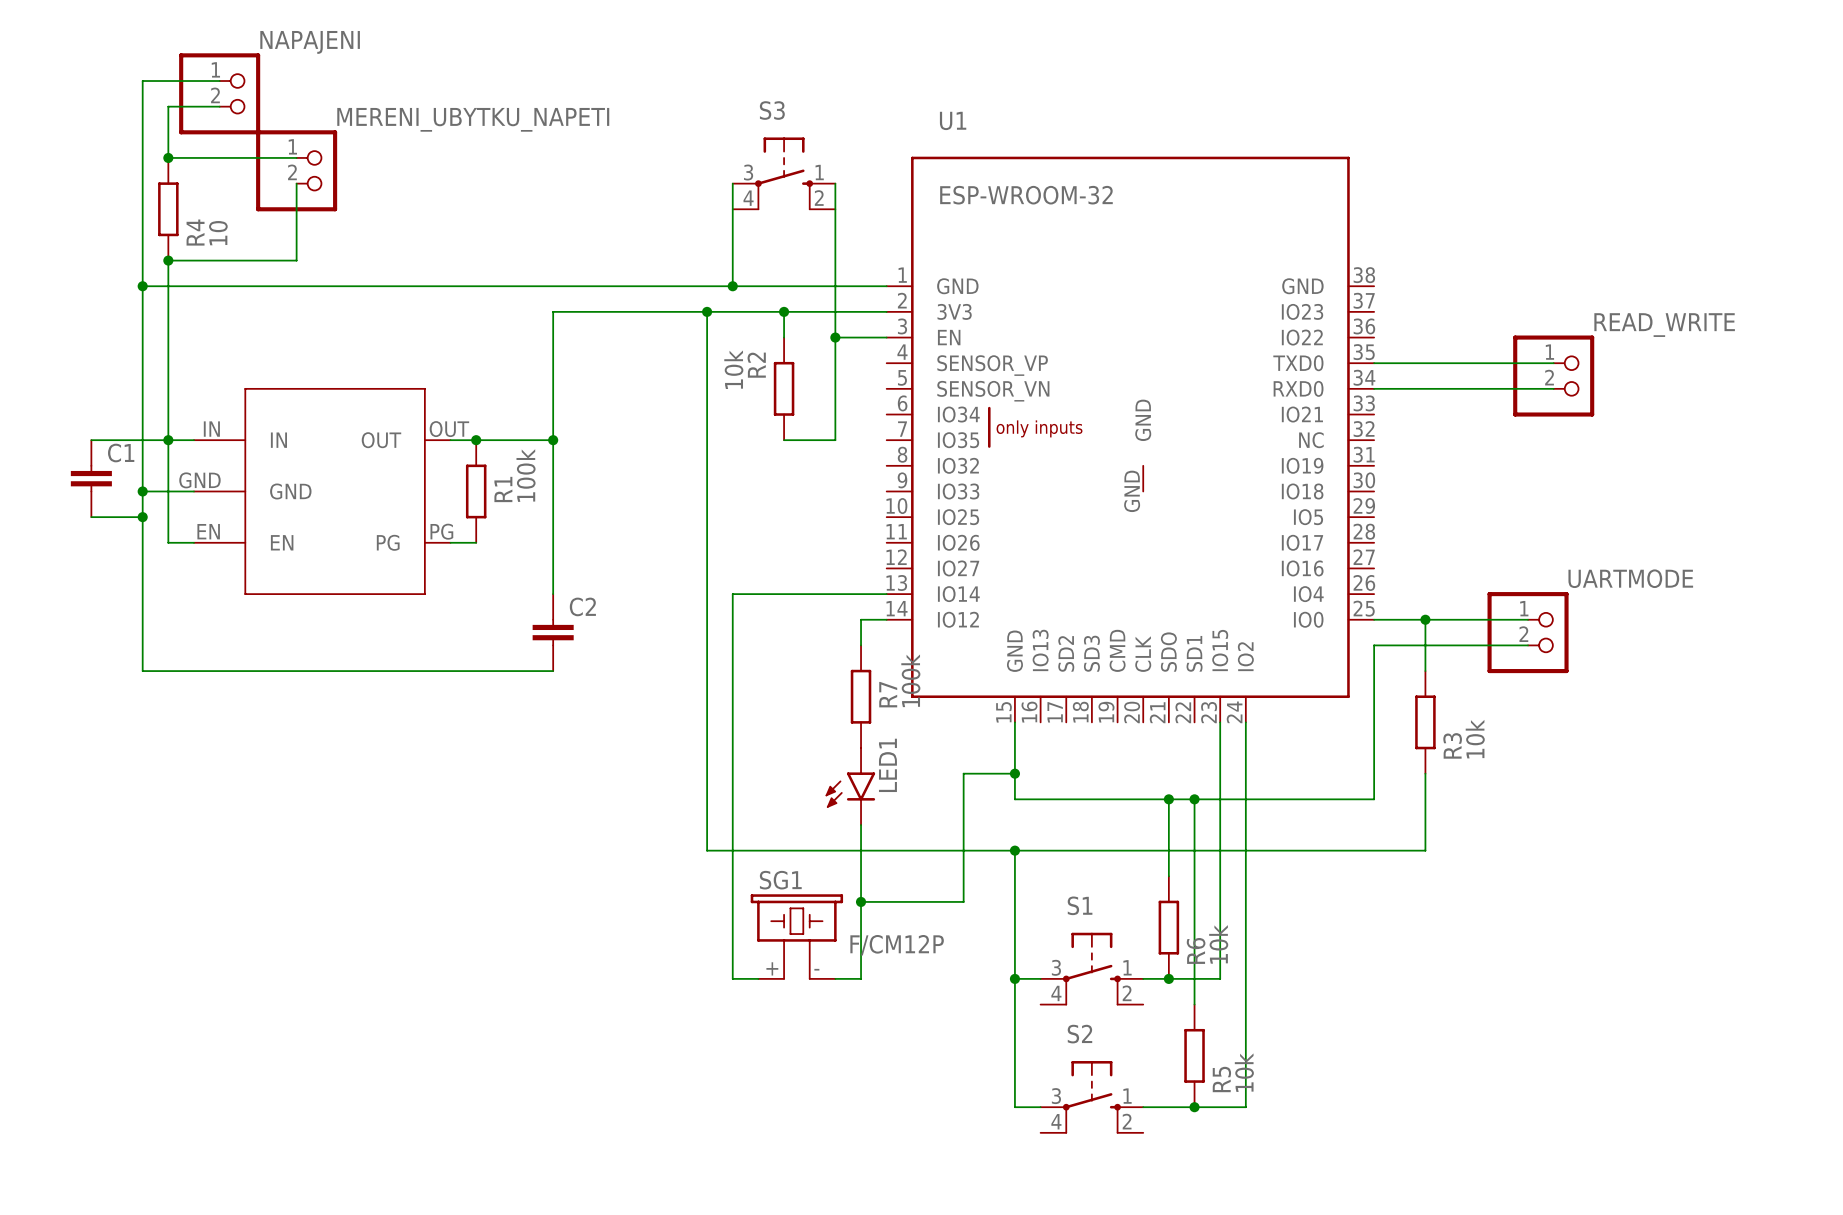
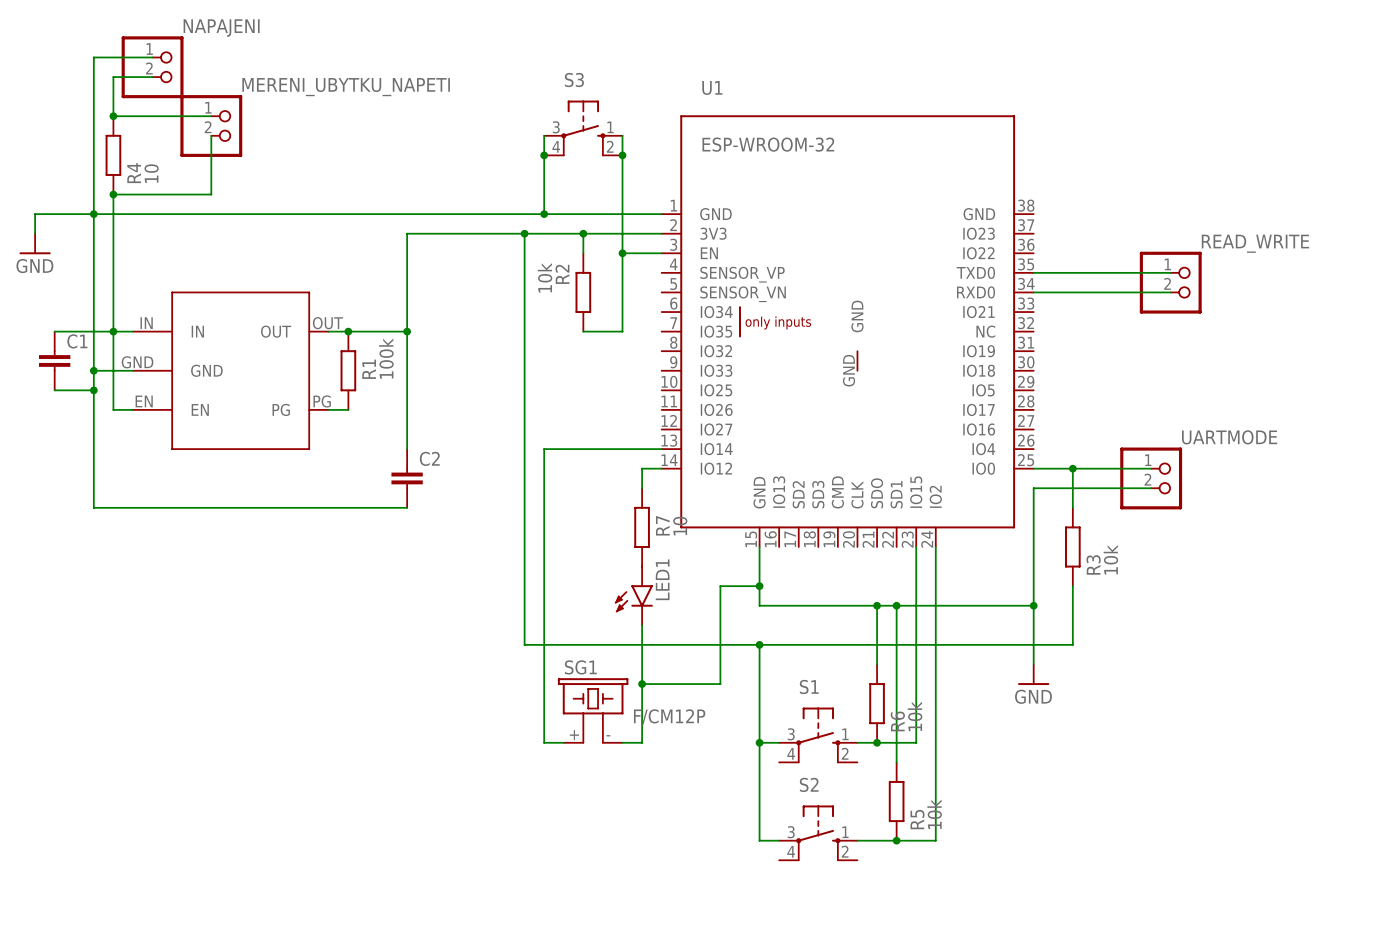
junction: none -> (544, 155)
junction: none -> (622, 155)
wire: none -> (93, 214) (35, 214) (35, 233)
power symbol: none -> GND (35, 243)
R7 value: 100k (910, 680) -> 10 (680, 526)
wire: none -> (1033, 605) (1033, 664)
junction: none -> (1033, 605)
power symbol: none -> GND (1033, 674)

